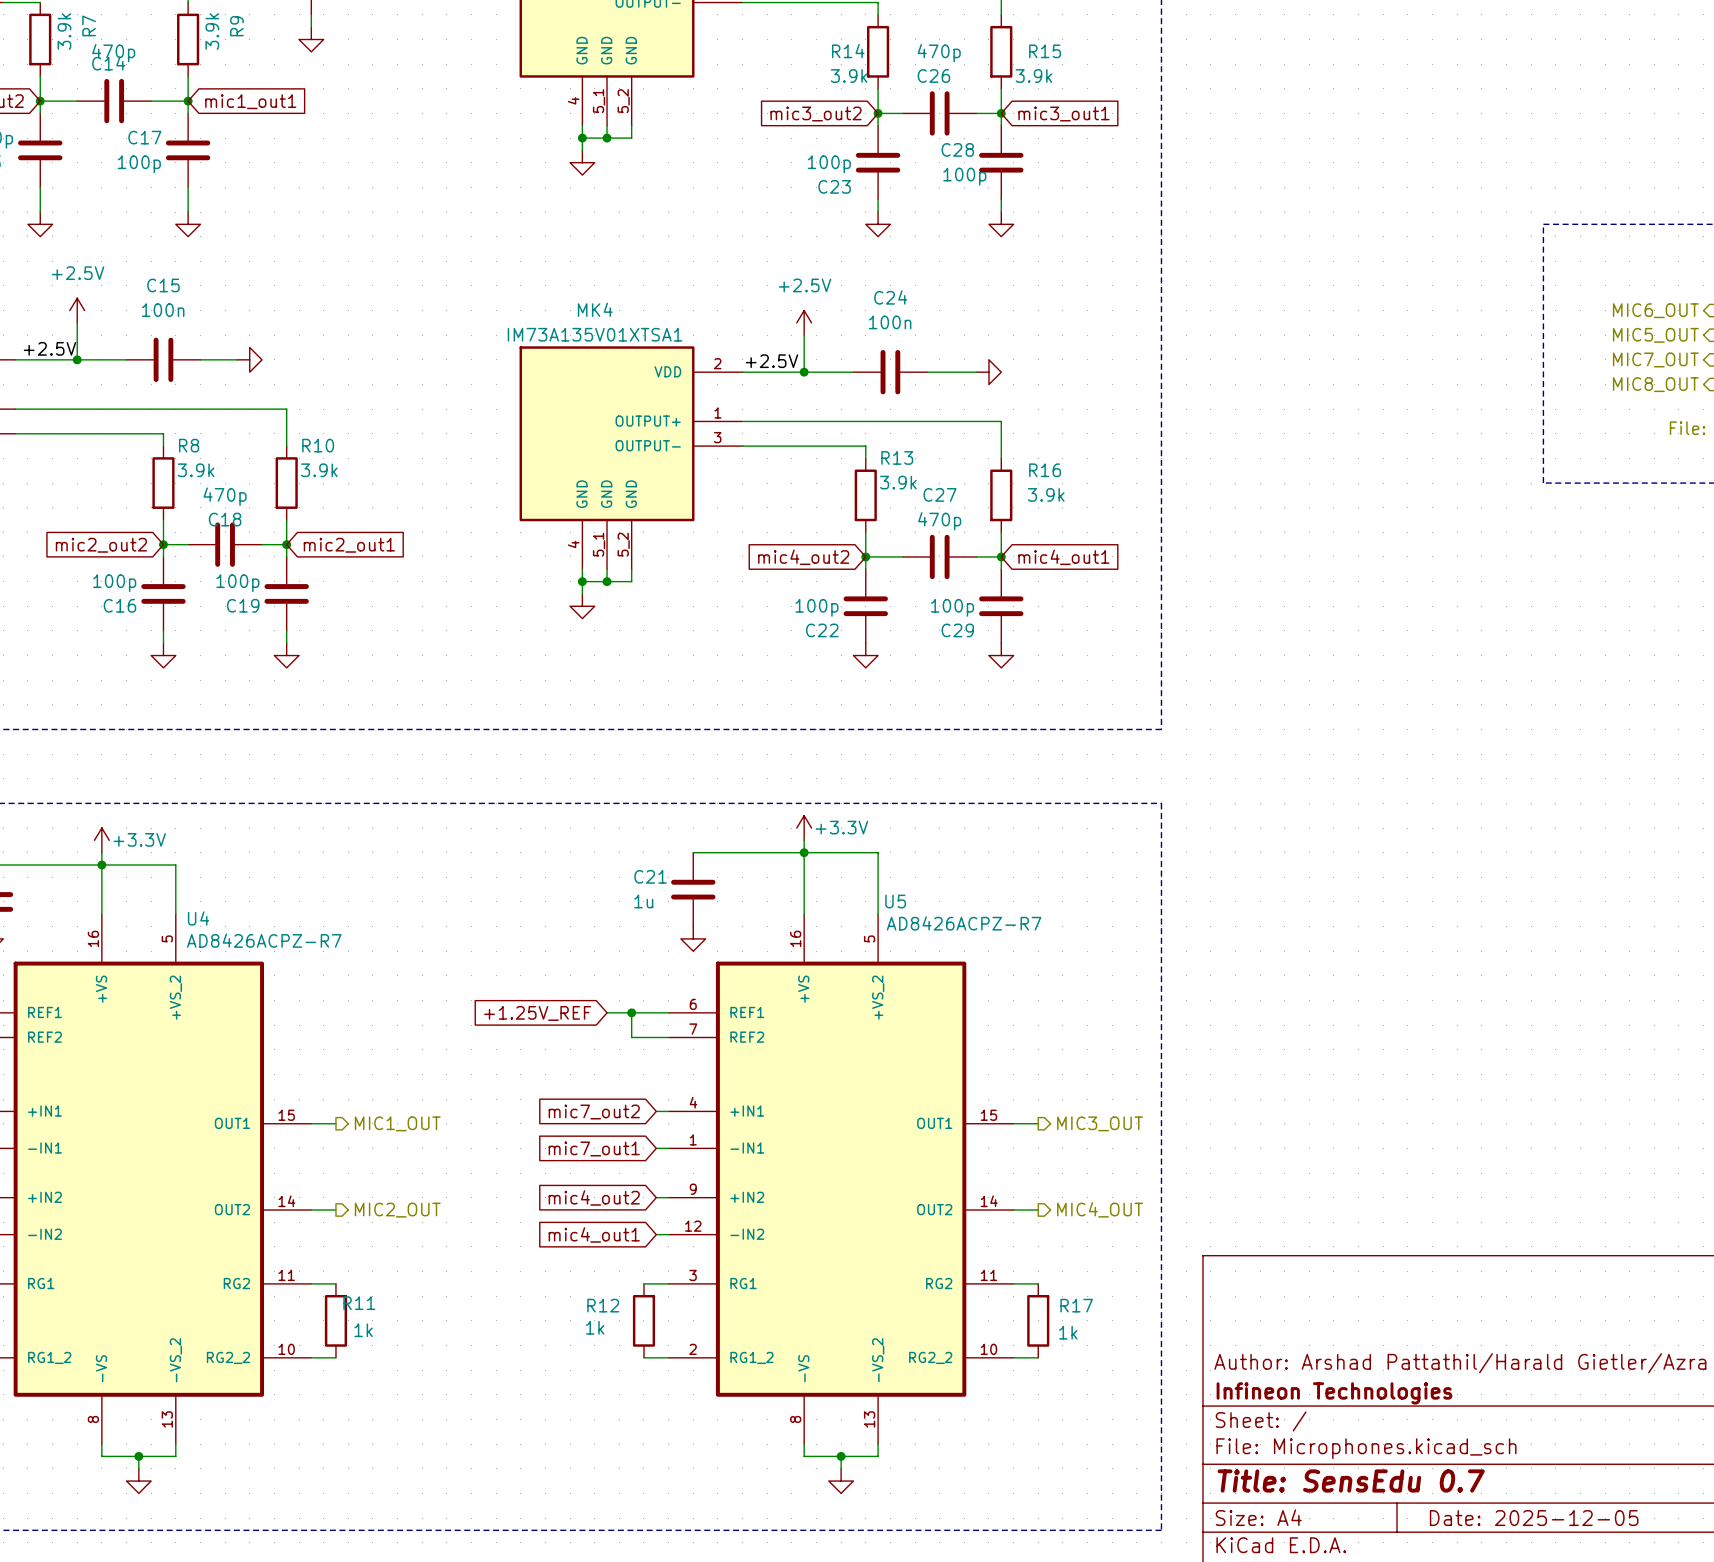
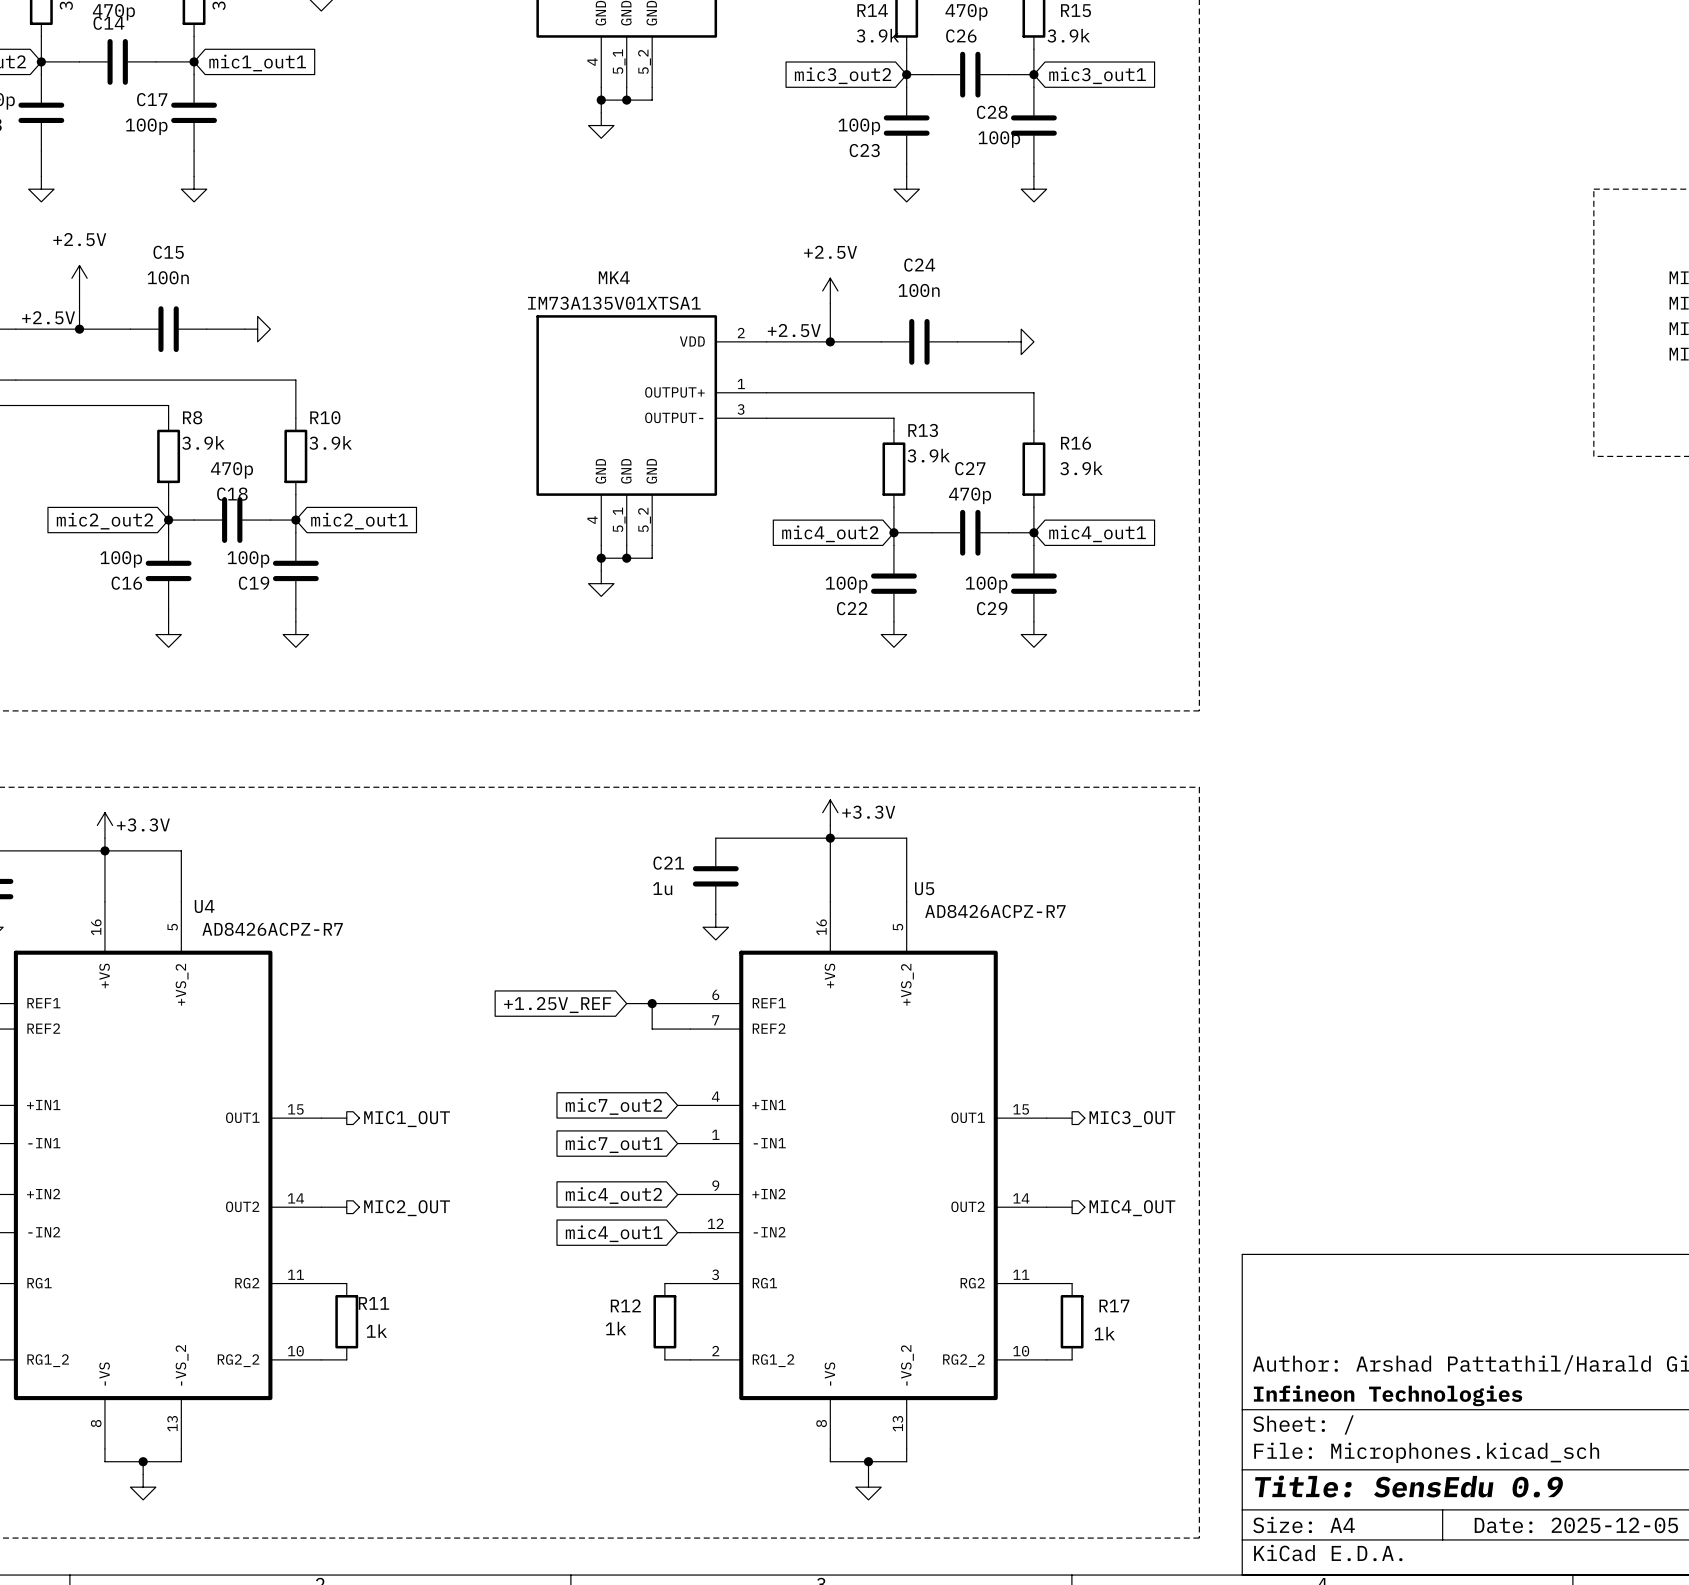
title block: Title: SensEdu 0.7 (1351, 1481) -> Title: SensEdu 0.9 (1409, 1486)

